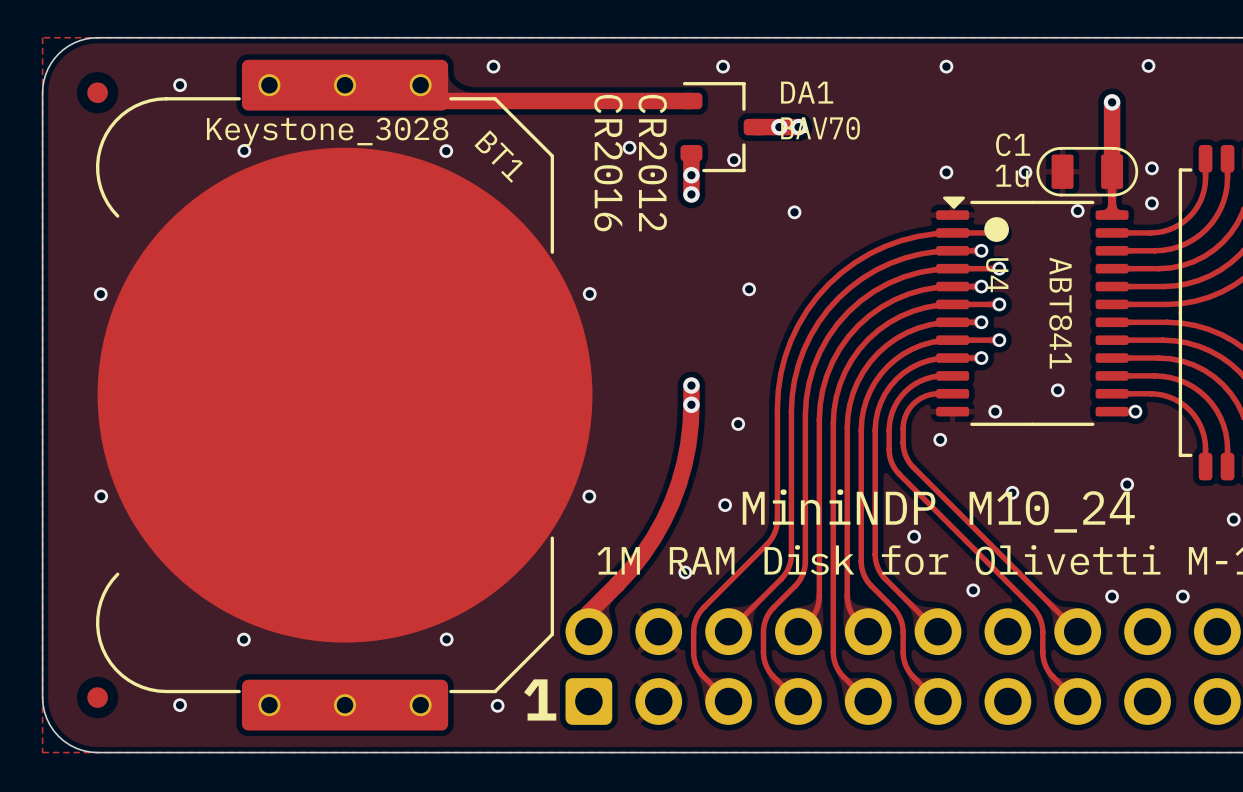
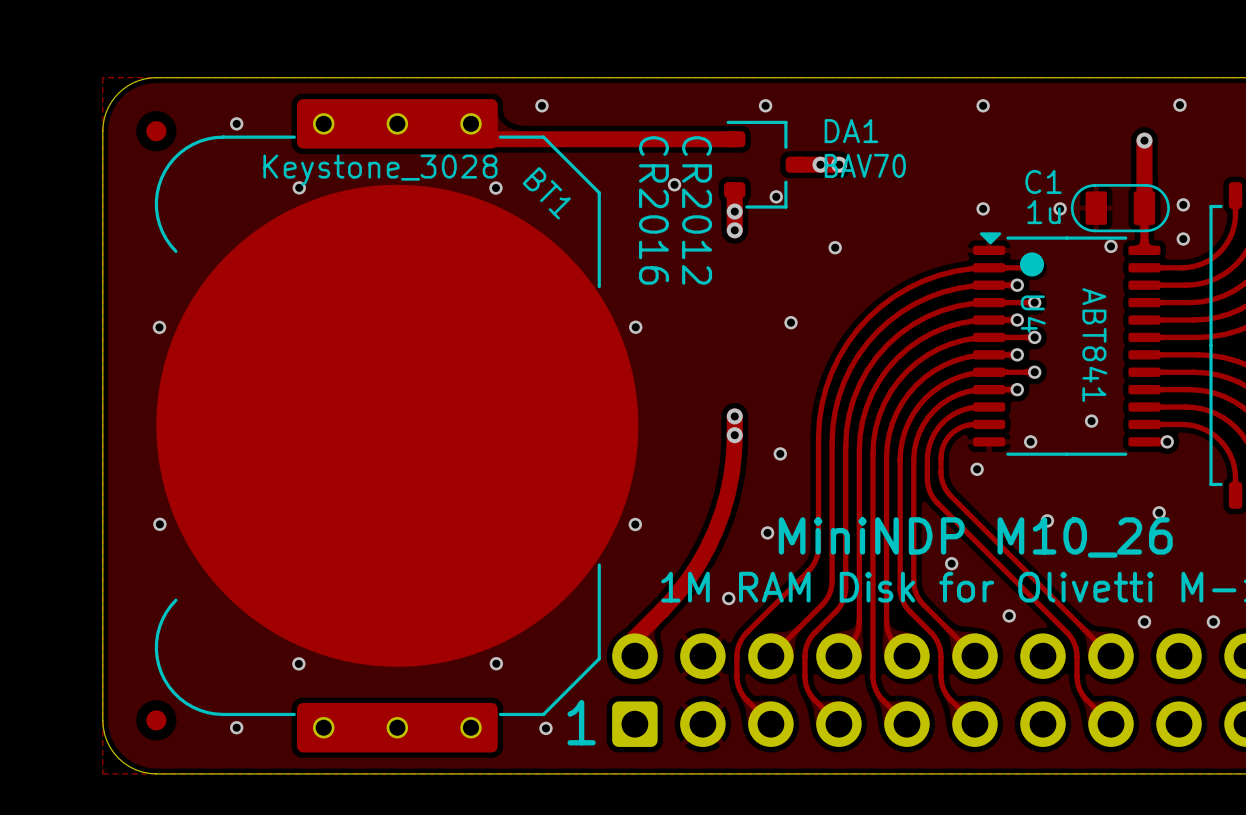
text: MiniNDP M10_24 (938, 511) -> MiniNDP M10_26 (975, 537)

